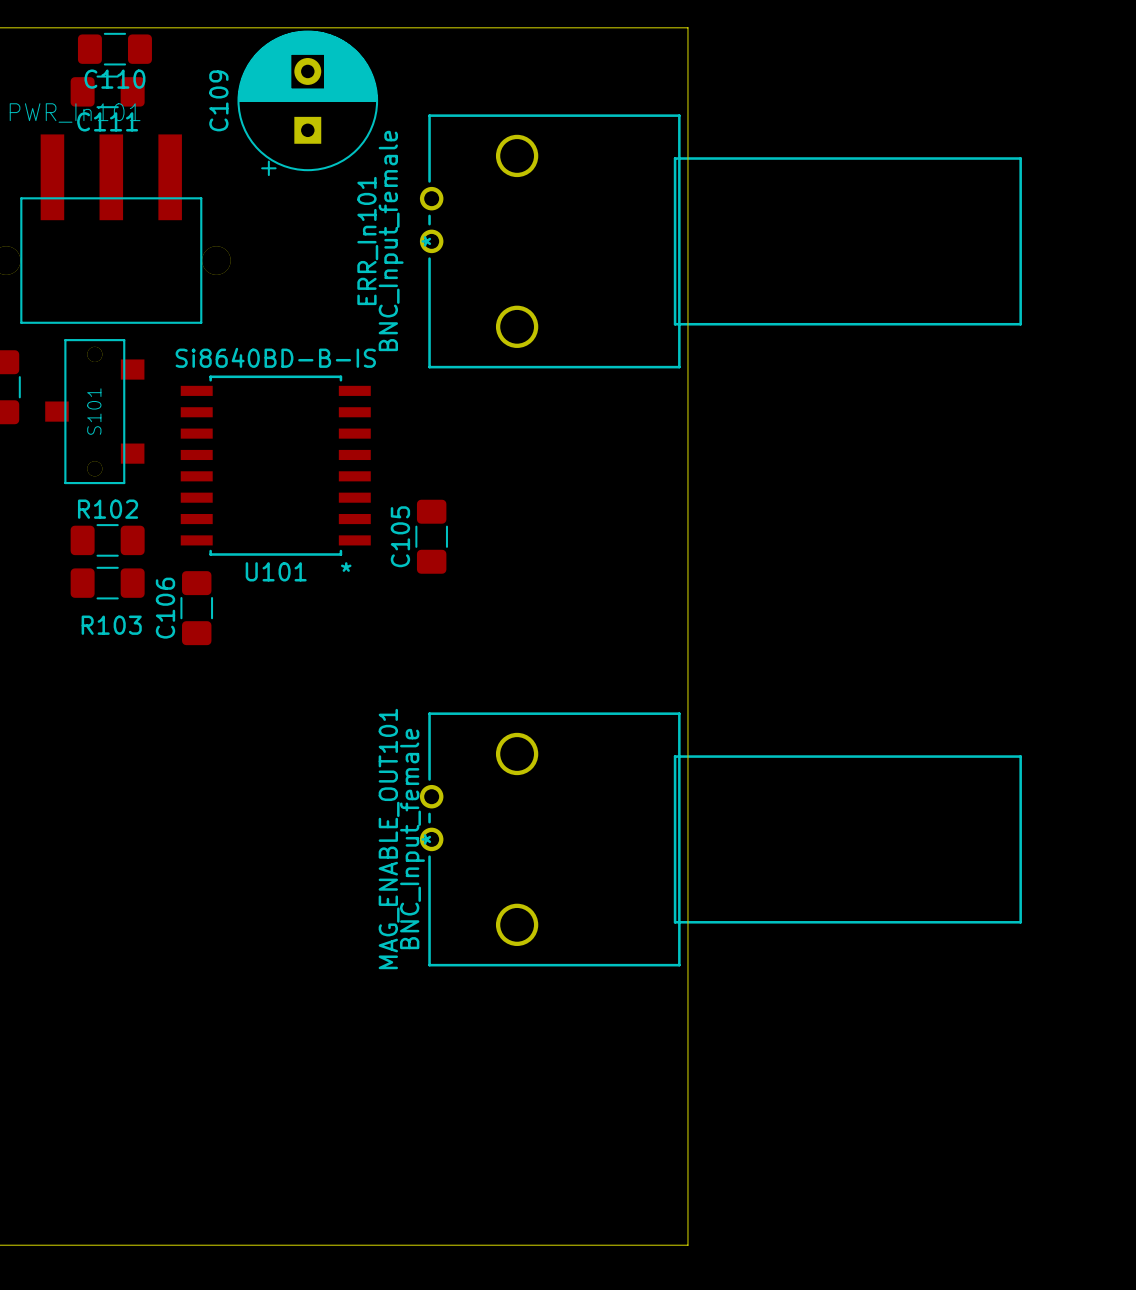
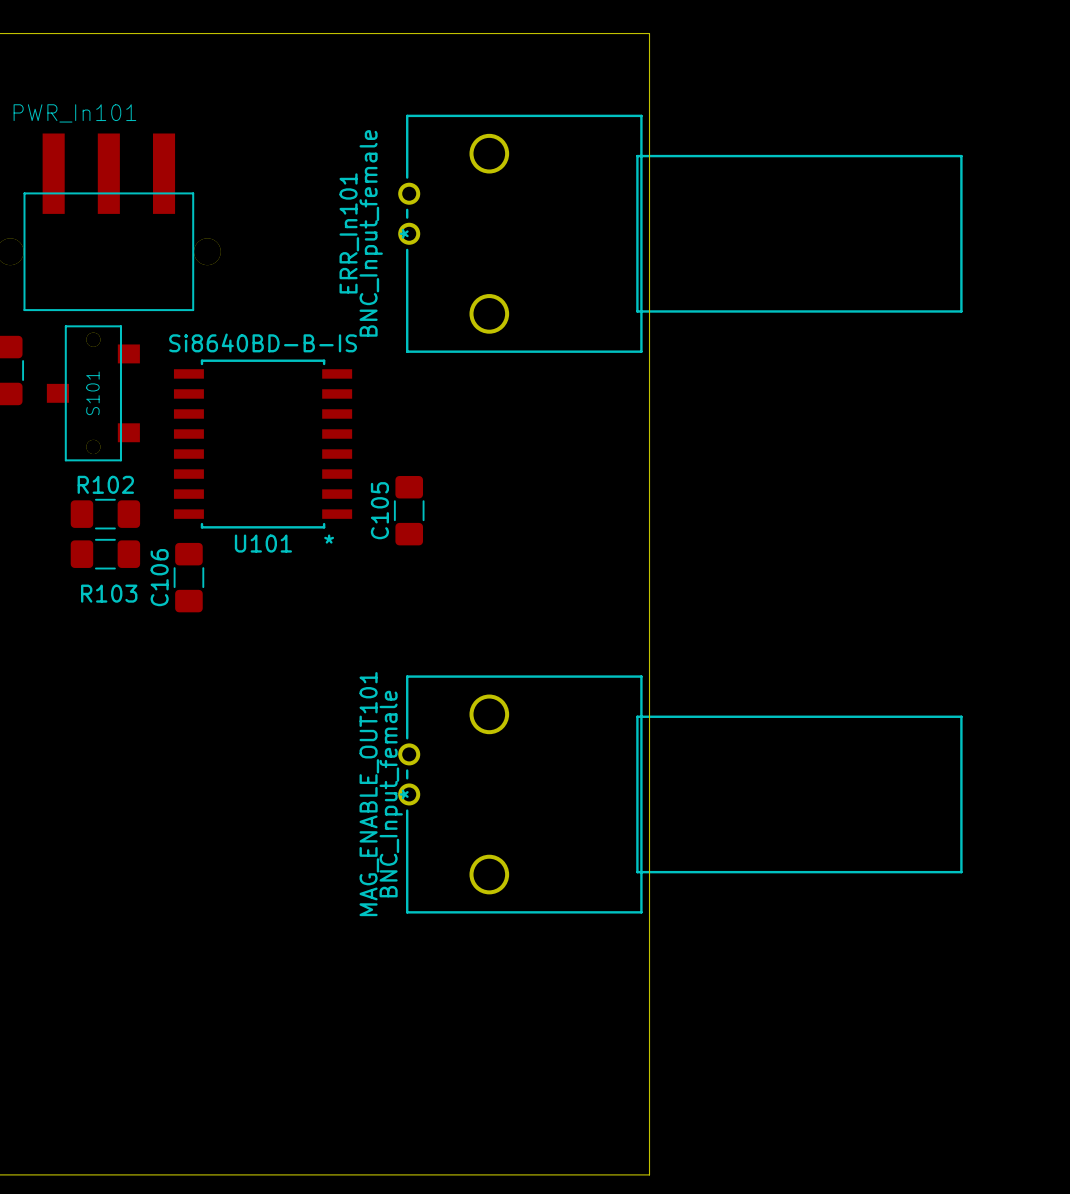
C110: (114, 49) -> none
C111: (107, 91) -> none
C109: (307, 103) -> none

